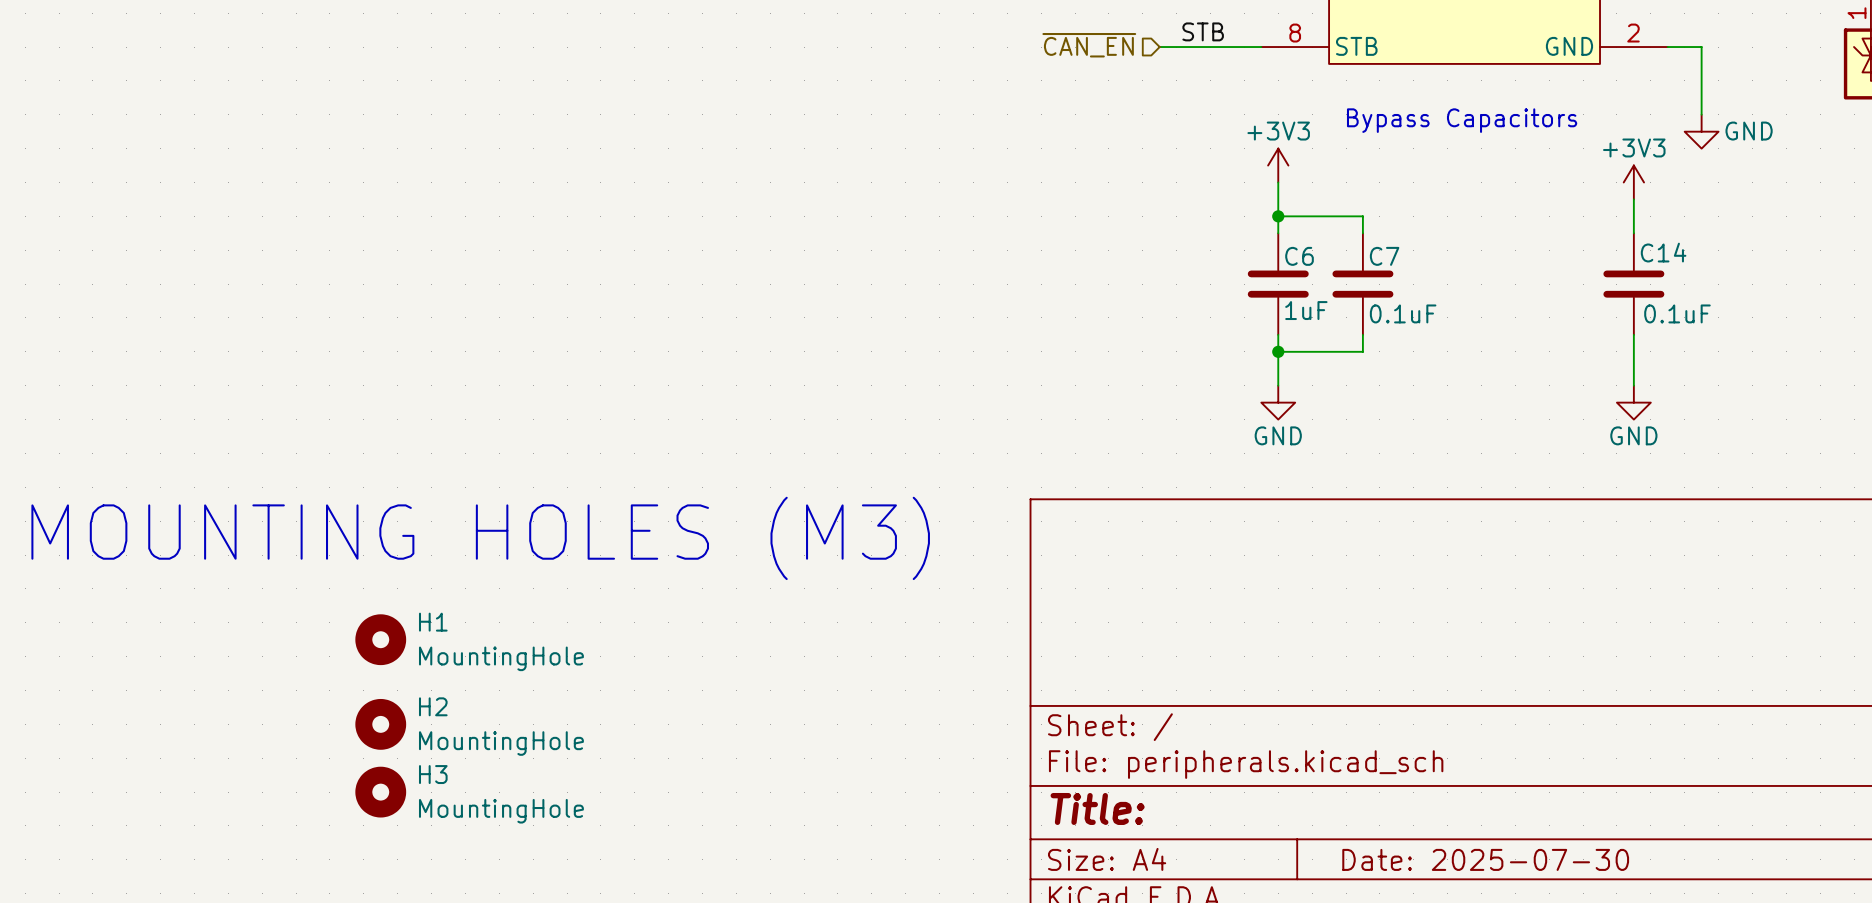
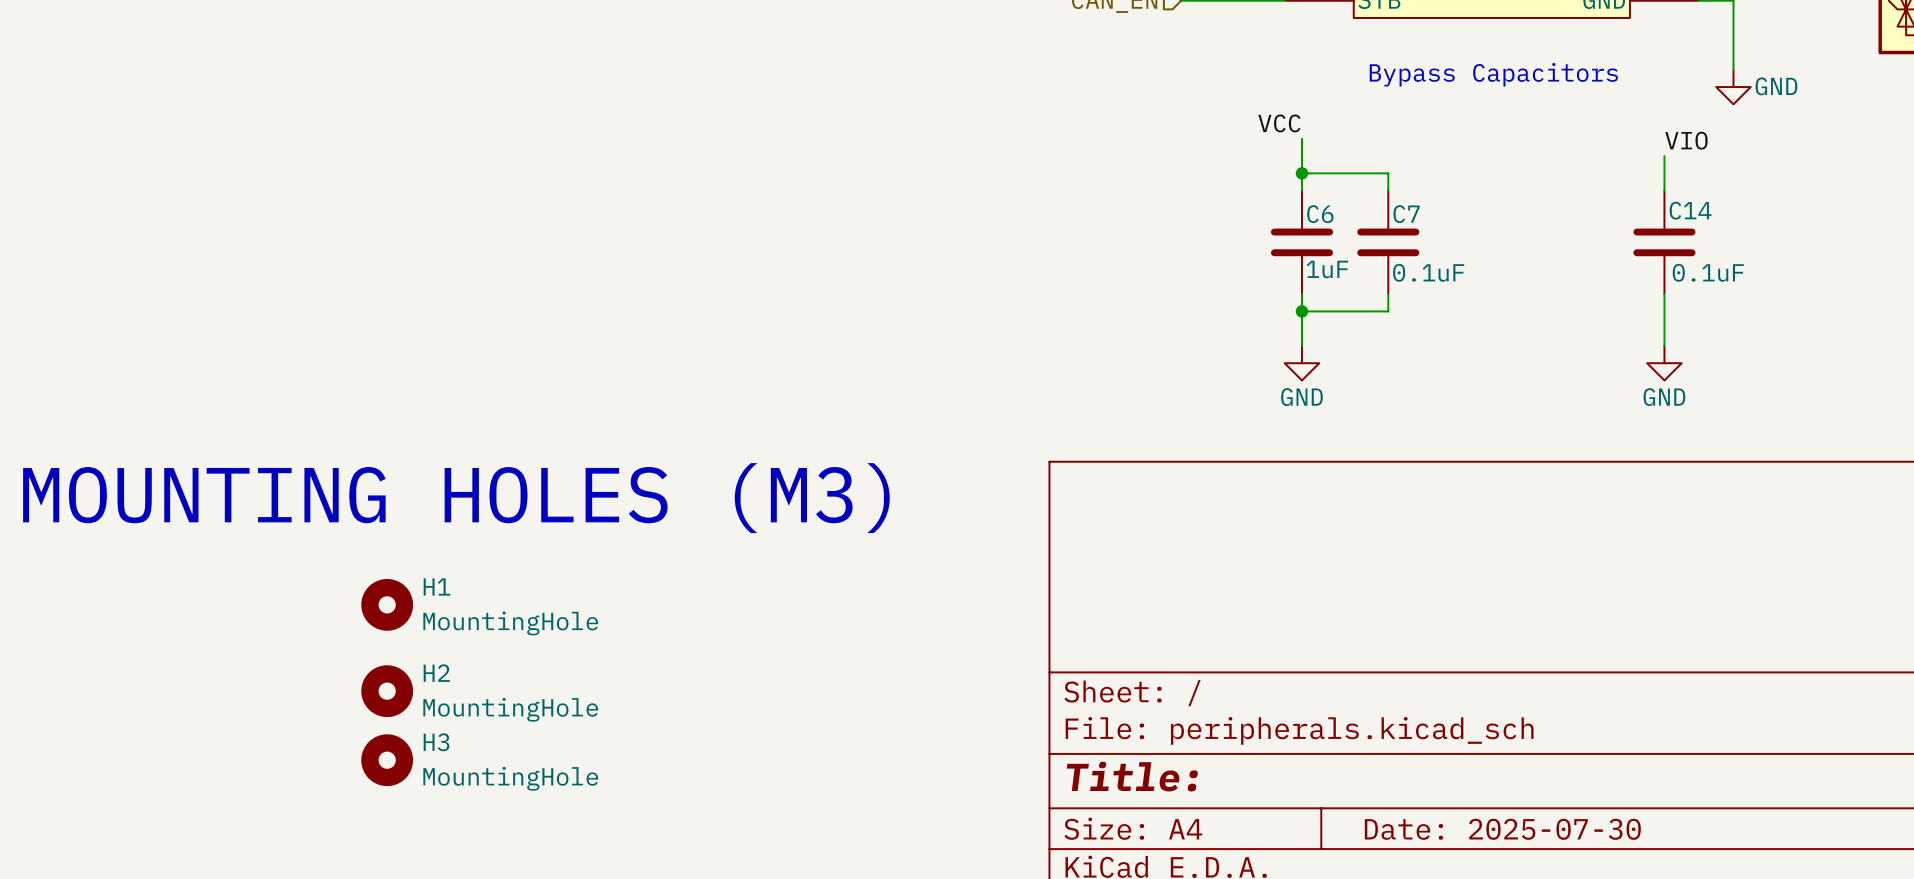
power symbol: +3V3 (1278, 165) -> none
label: none -> VCC (1279, 123)
power symbol: +3V3 (1633, 182) -> none
label: none -> VIO (1686, 140)

